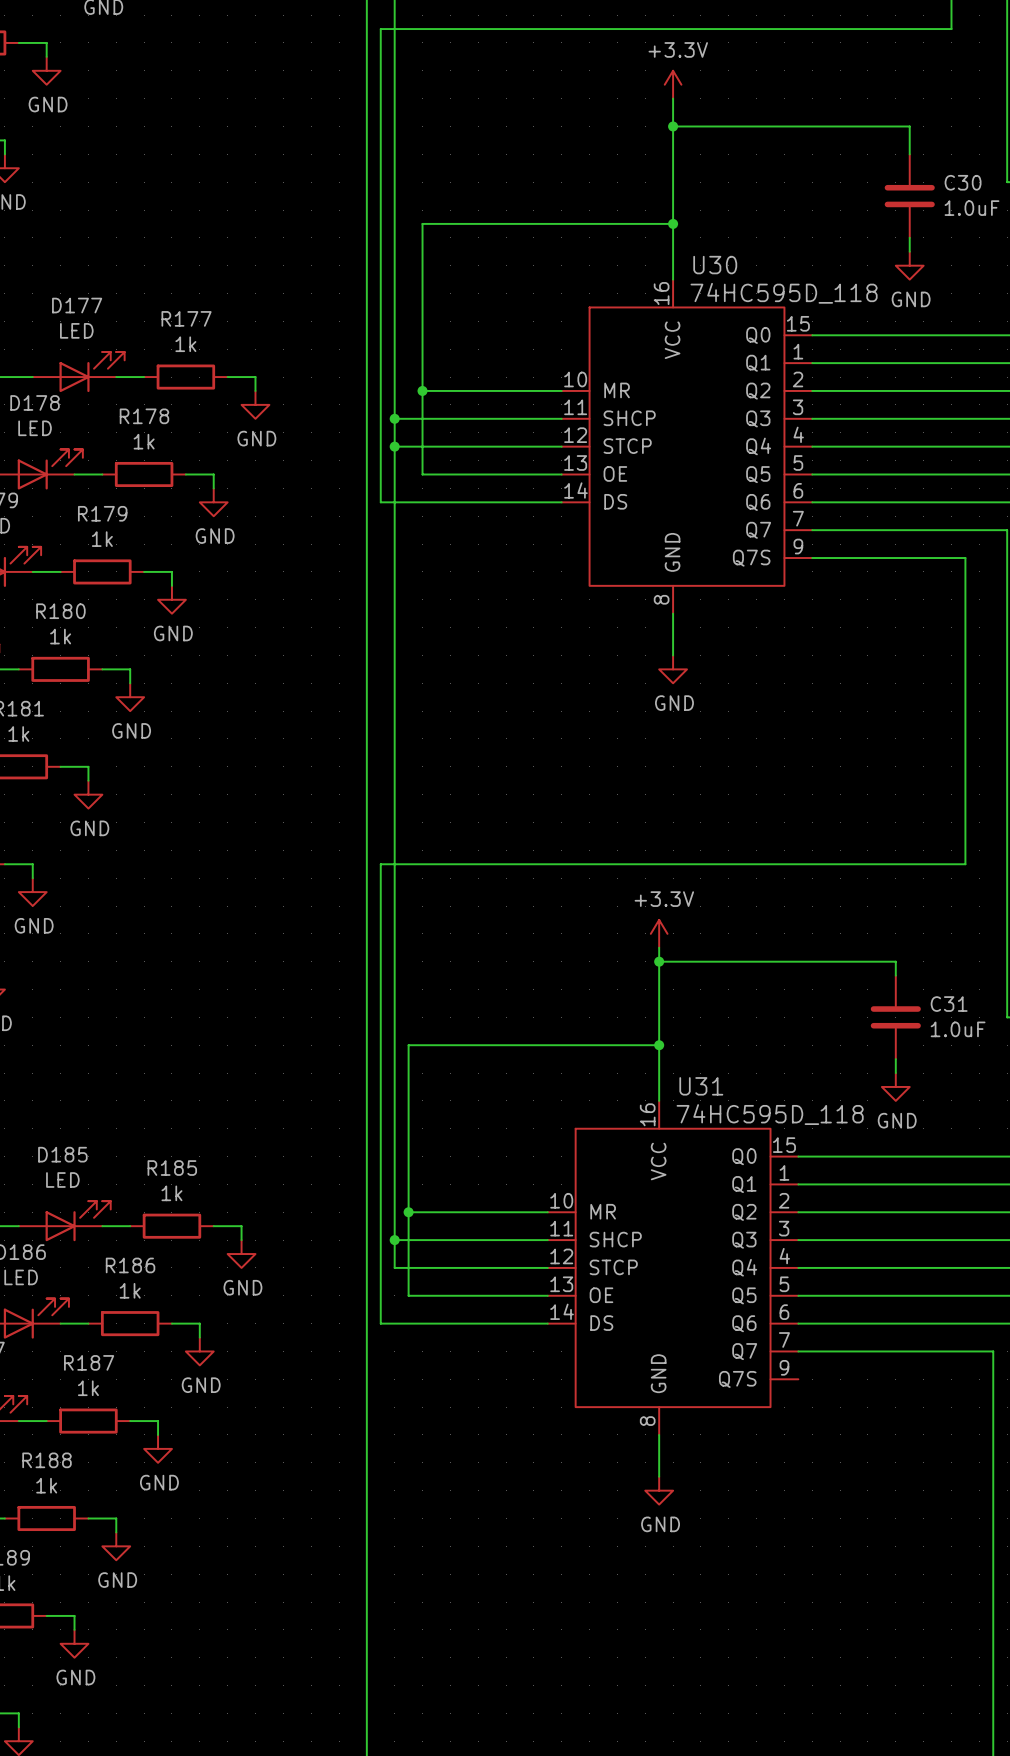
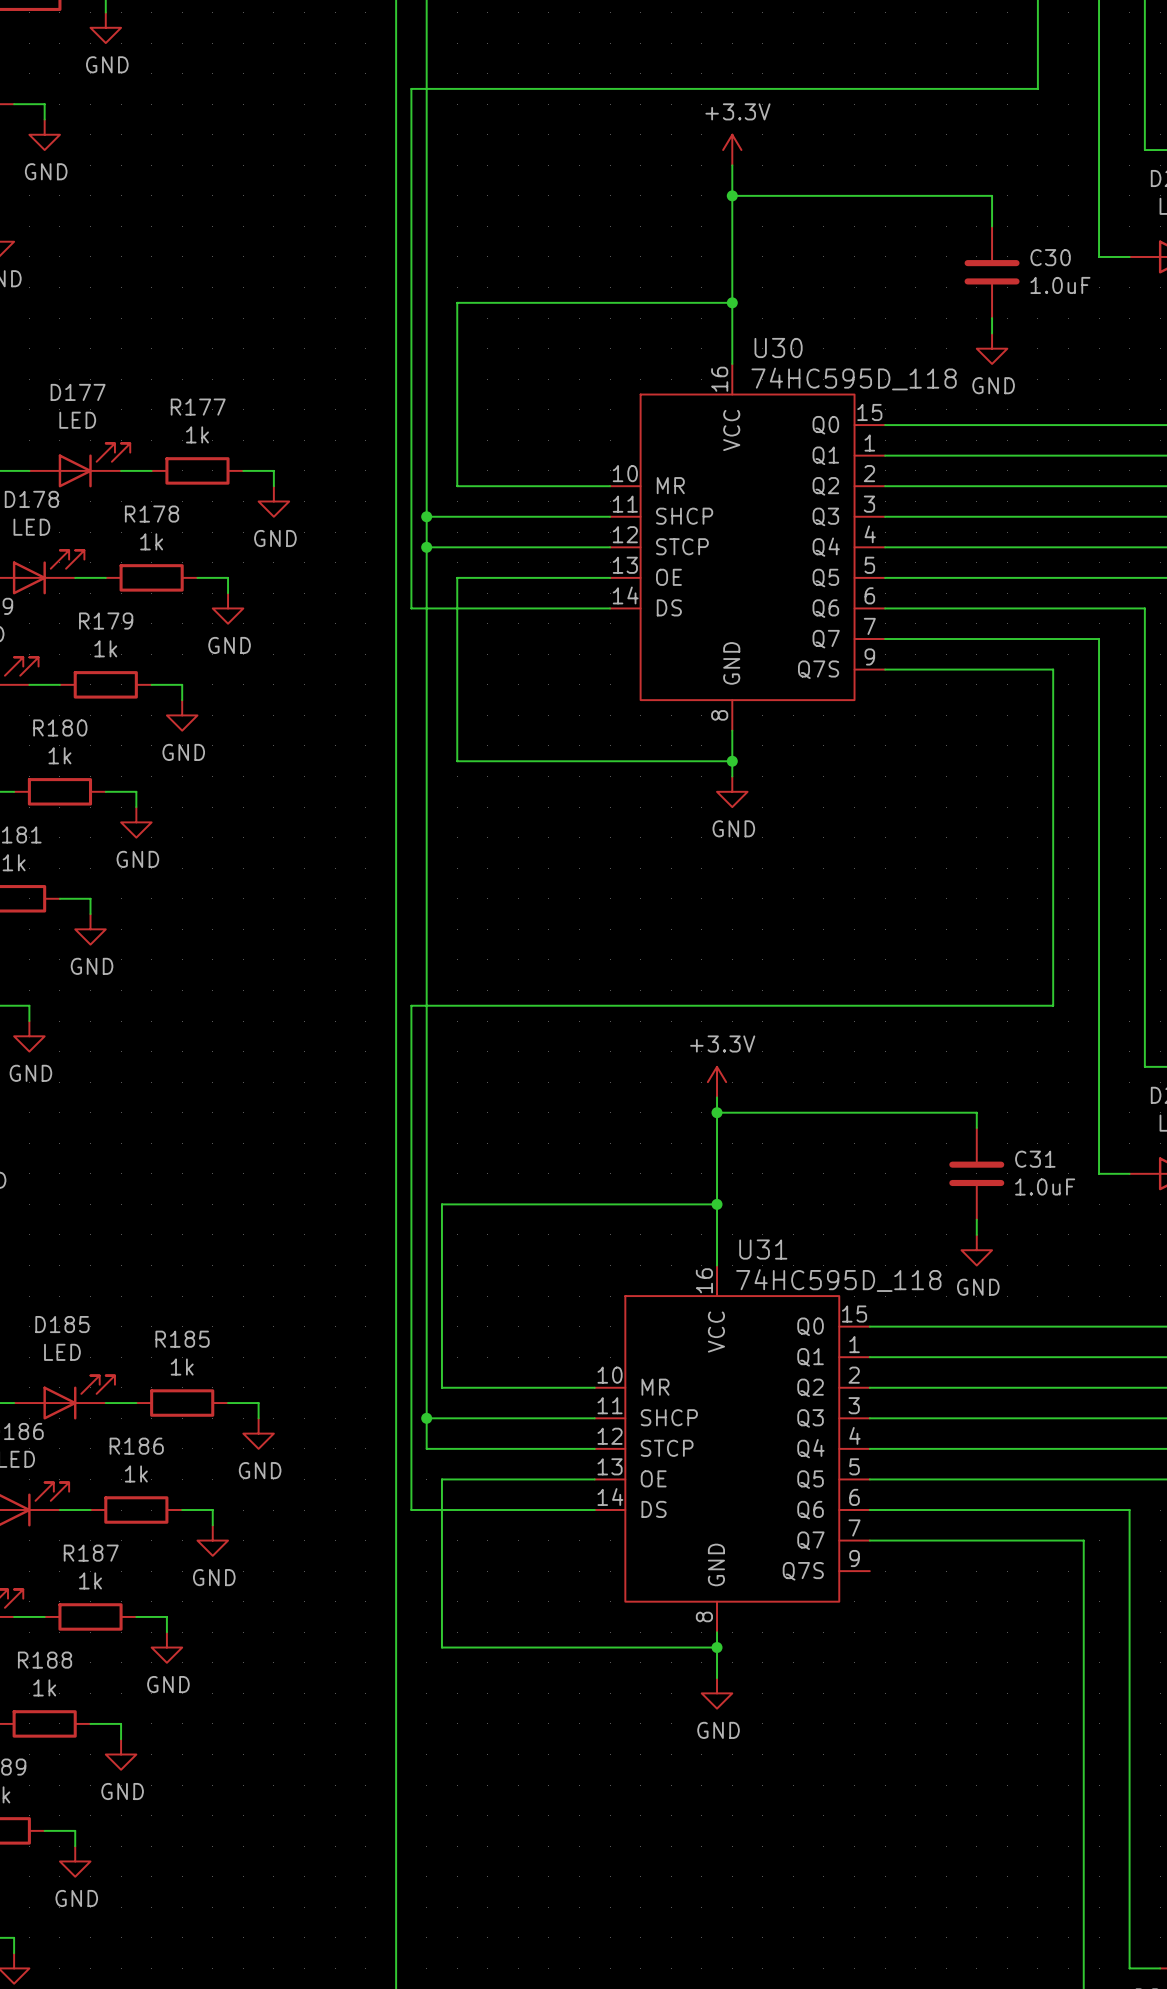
wire: (422, 390) (422, 474) -> (732, 761) (457, 761) (457, 577)
junction: (422, 390) -> none
junction: none -> (732, 761)
wire: (408, 1212) (408, 1295) -> (717, 1647) (441, 1647) (441, 1479)
junction: (408, 1212) -> none
junction: none -> (717, 1647)

